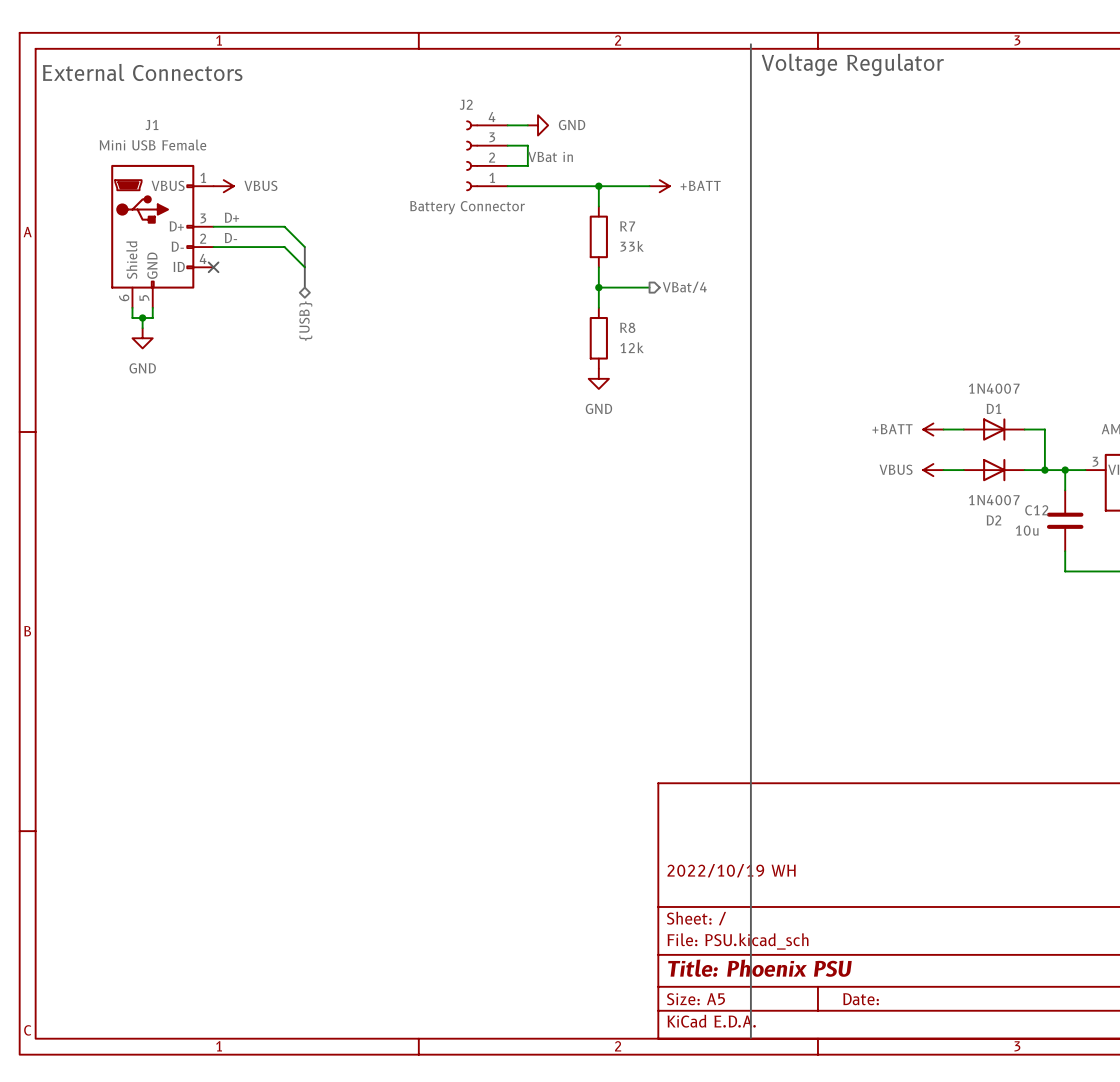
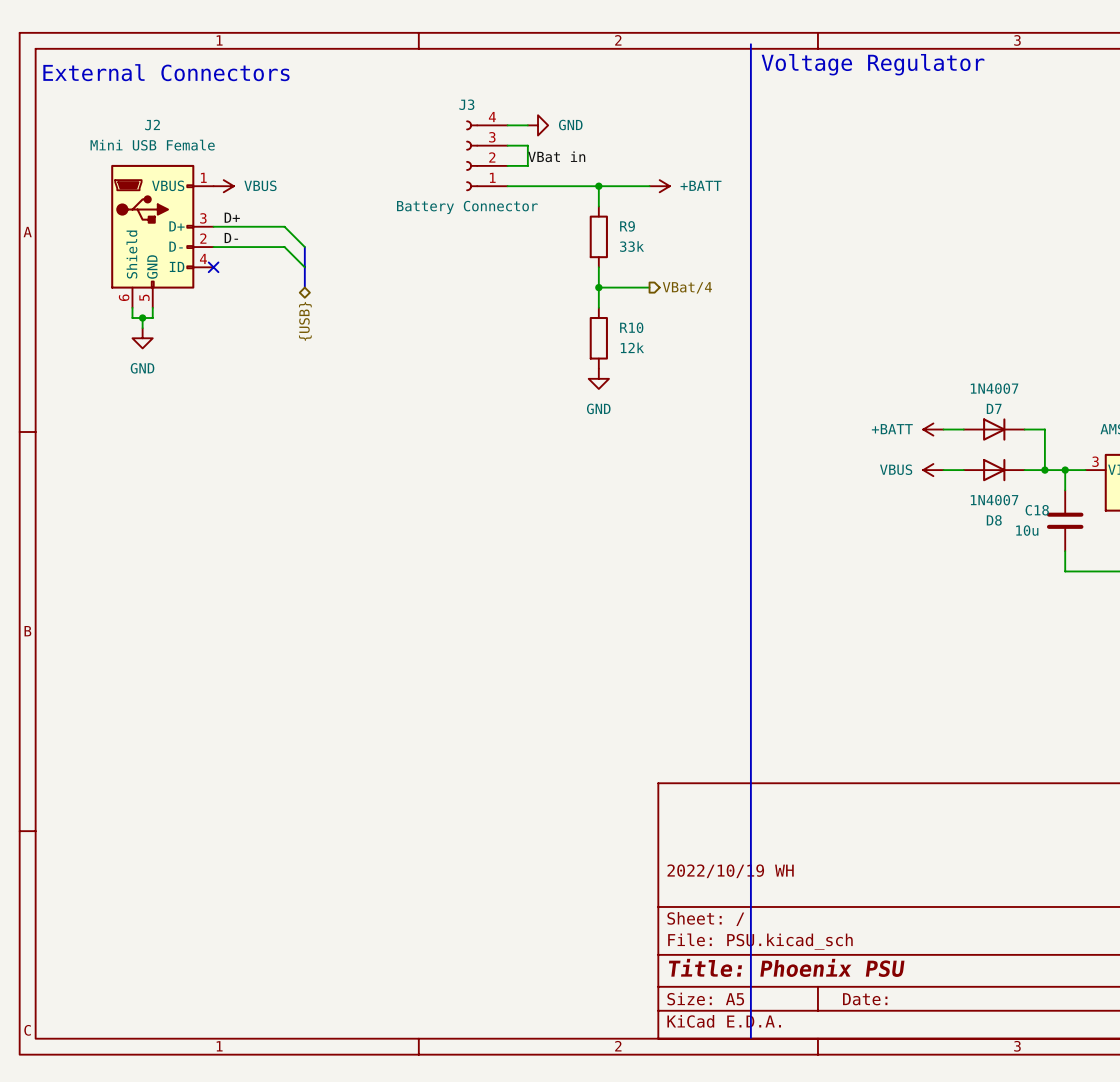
J2 name: J2 (466, 104) -> J3 (466, 104)
J1 name: J1 (151, 125) -> J2 (152, 125)
R7 name: R7 (627, 226) -> R9 (627, 226)
R8 name: R8 (627, 327) -> R10 (631, 327)
D1 name: D1 (993, 408) -> D7 (994, 408)
C12 name: C12 (1036, 510) -> C18 (1037, 510)
D2 name: D2 (993, 520) -> D8 (994, 520)

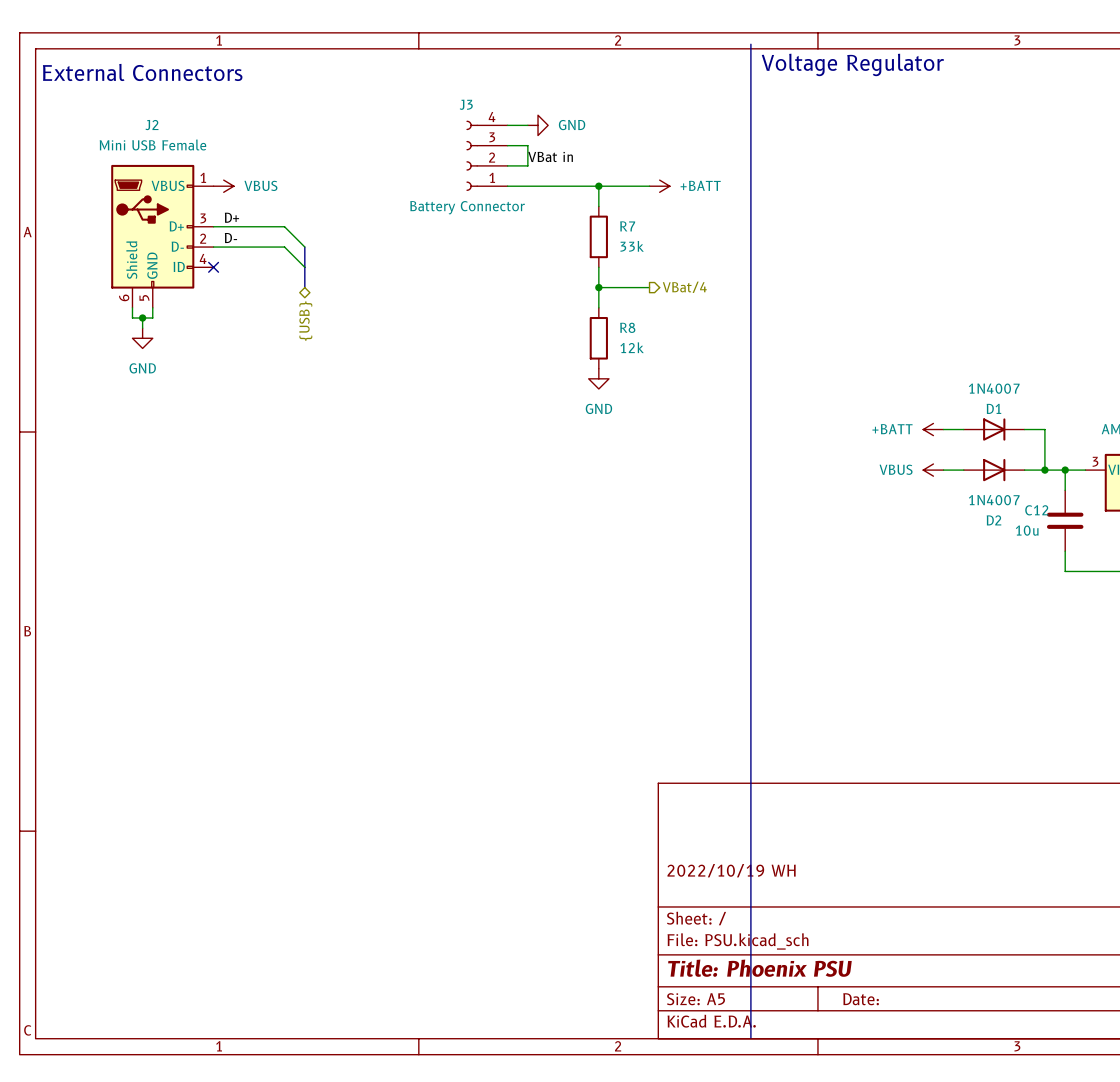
R9 name: R9 (627, 226) -> R7 (627, 226)
R10 name: R10 (631, 327) -> R8 (627, 327)
D7 name: D7 (994, 408) -> D1 (993, 408)
C18 name: C18 (1037, 510) -> C12 (1036, 510)
D8 name: D8 (994, 520) -> D2 (993, 520)

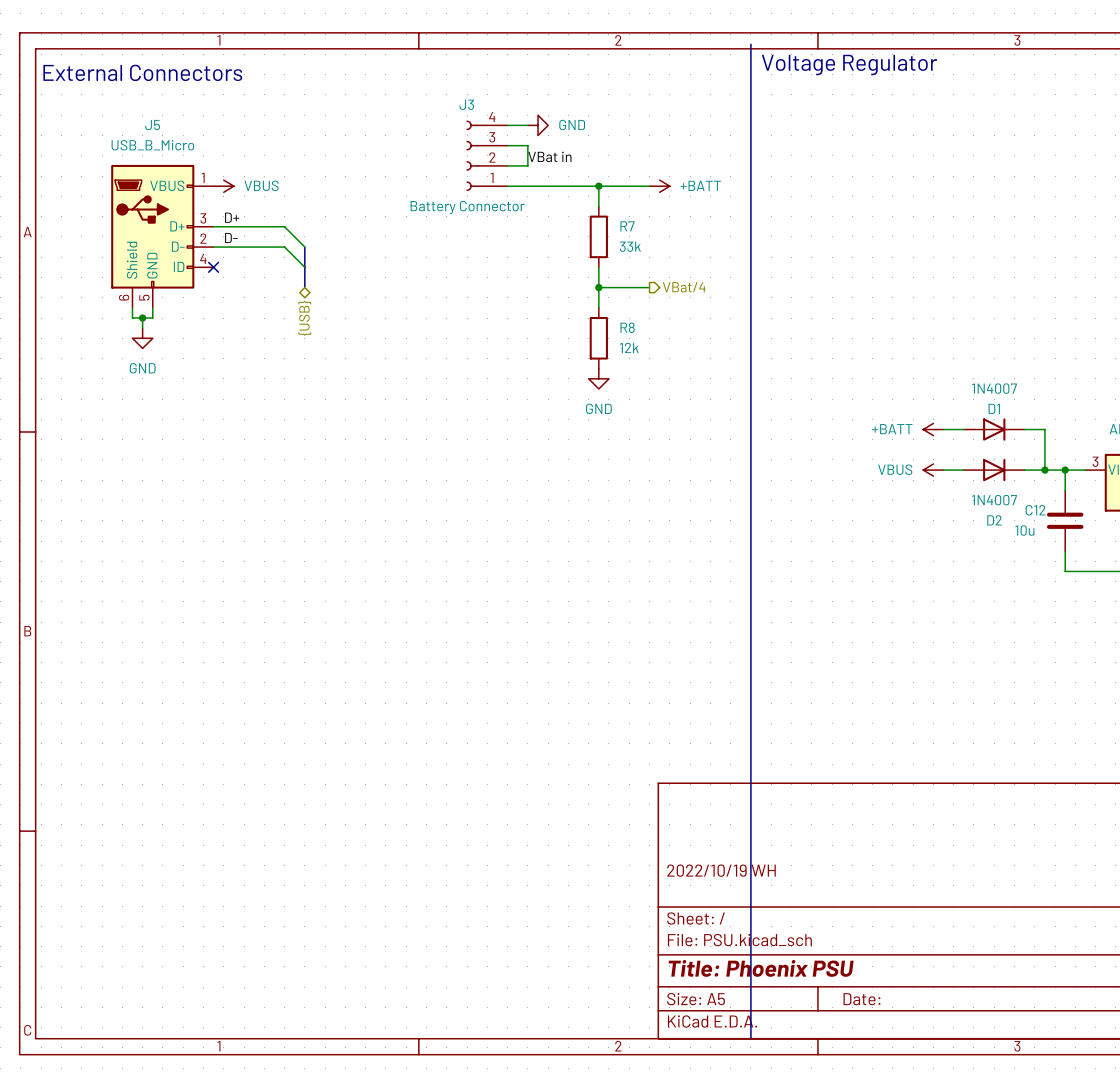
J2 name: J2 (151, 125) -> J5 (152, 125)
J2 value: Mini USB Female (152, 145) -> USB_B_Micro (152, 145)

